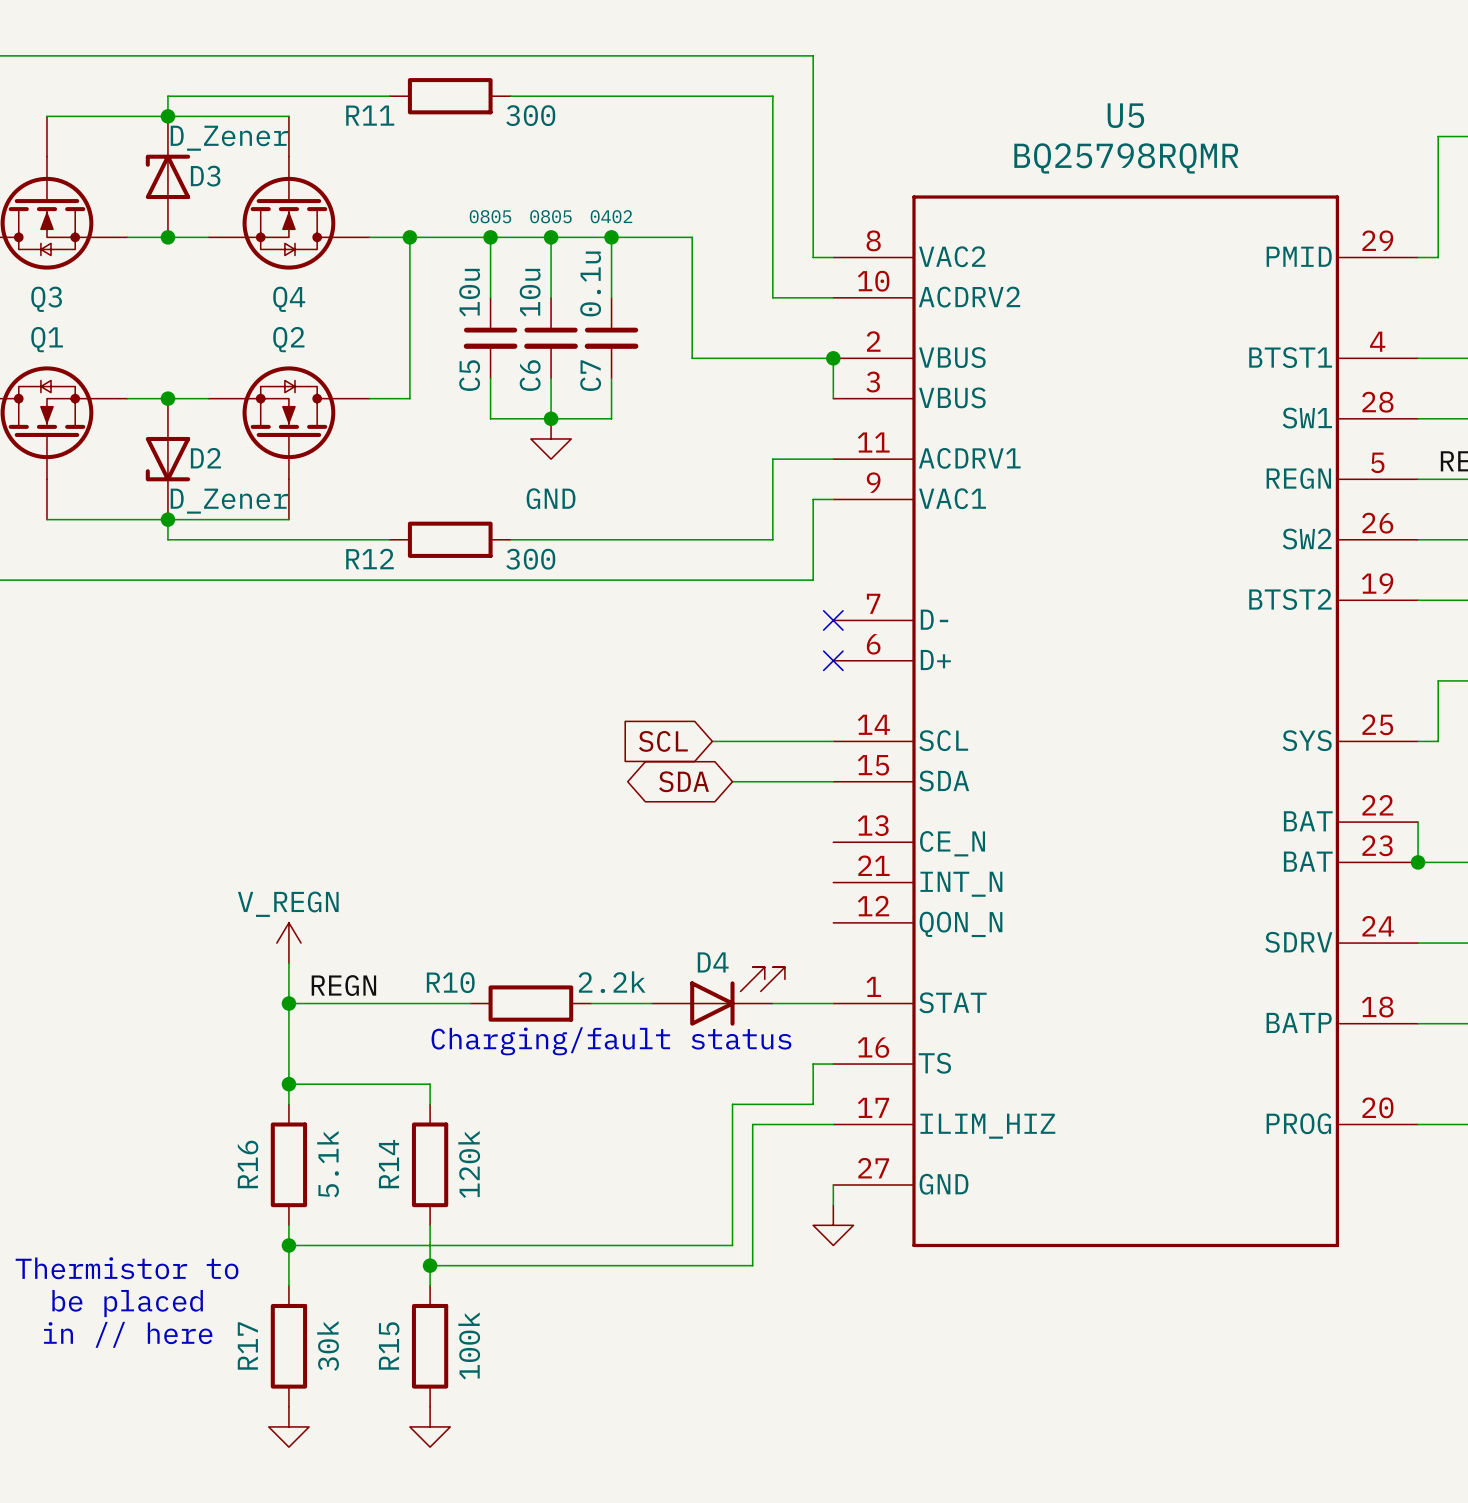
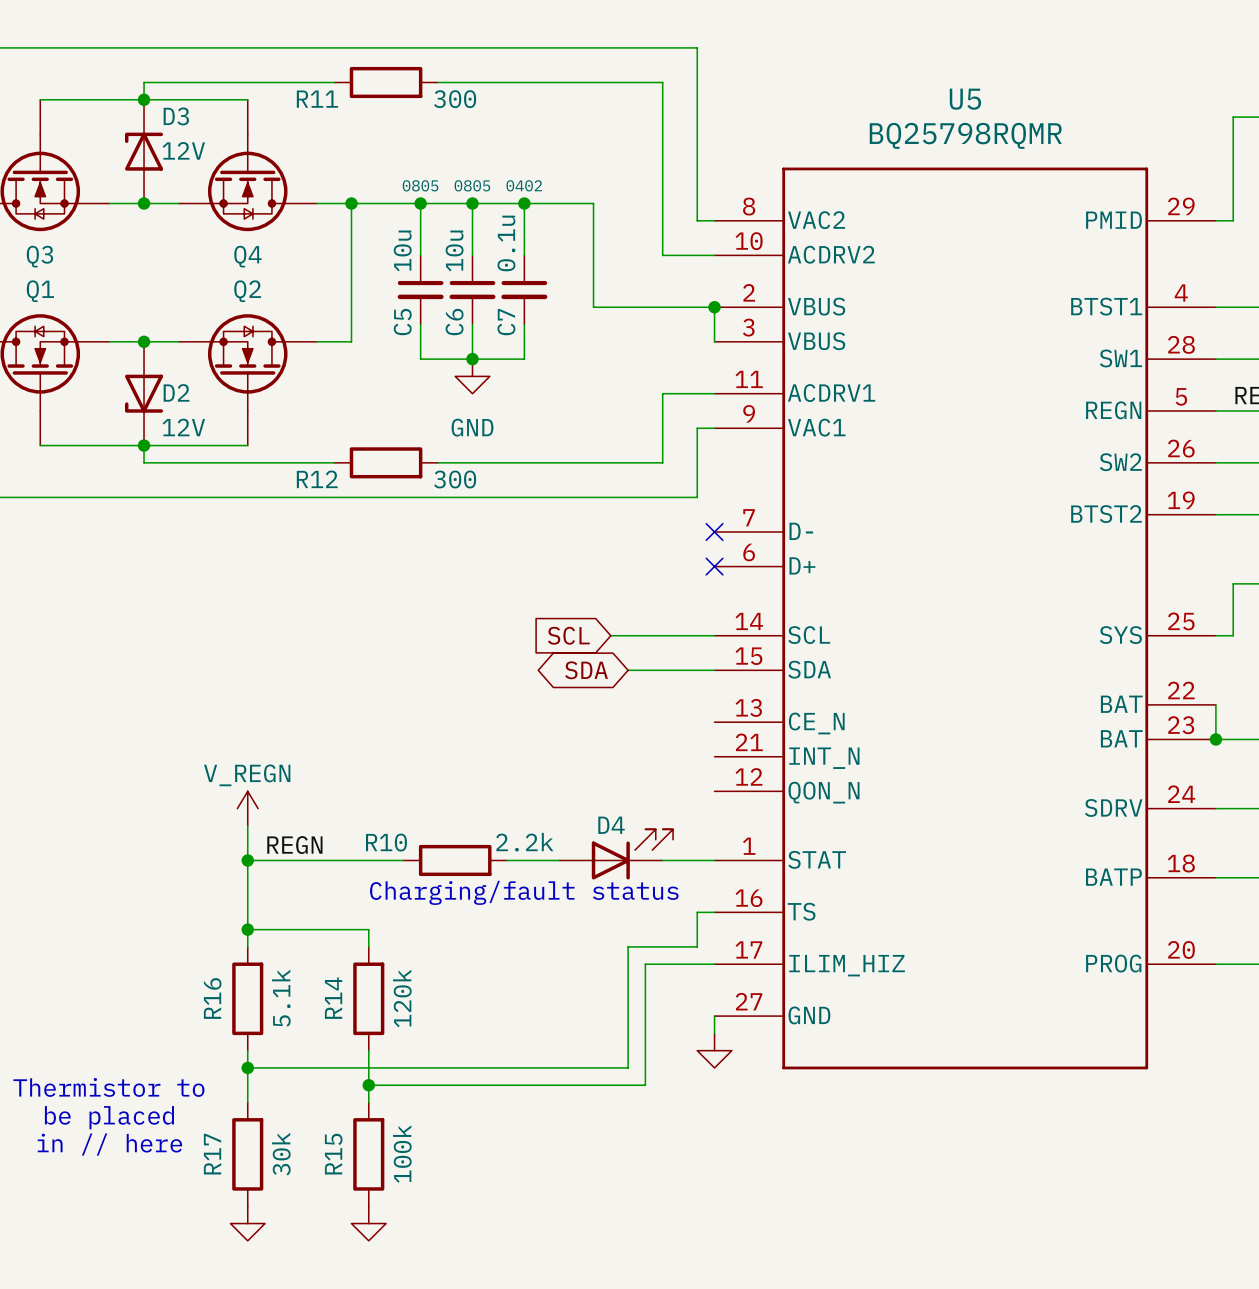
D3 value: D_Zener (229, 138) -> none
D3 text: none -> 12V (183, 150)
D3 name position: D3 (205, 176) -> D3 (176, 116)
D2 text: none -> 12V (183, 427)
D2 value: D_Zener (229, 501) -> none

